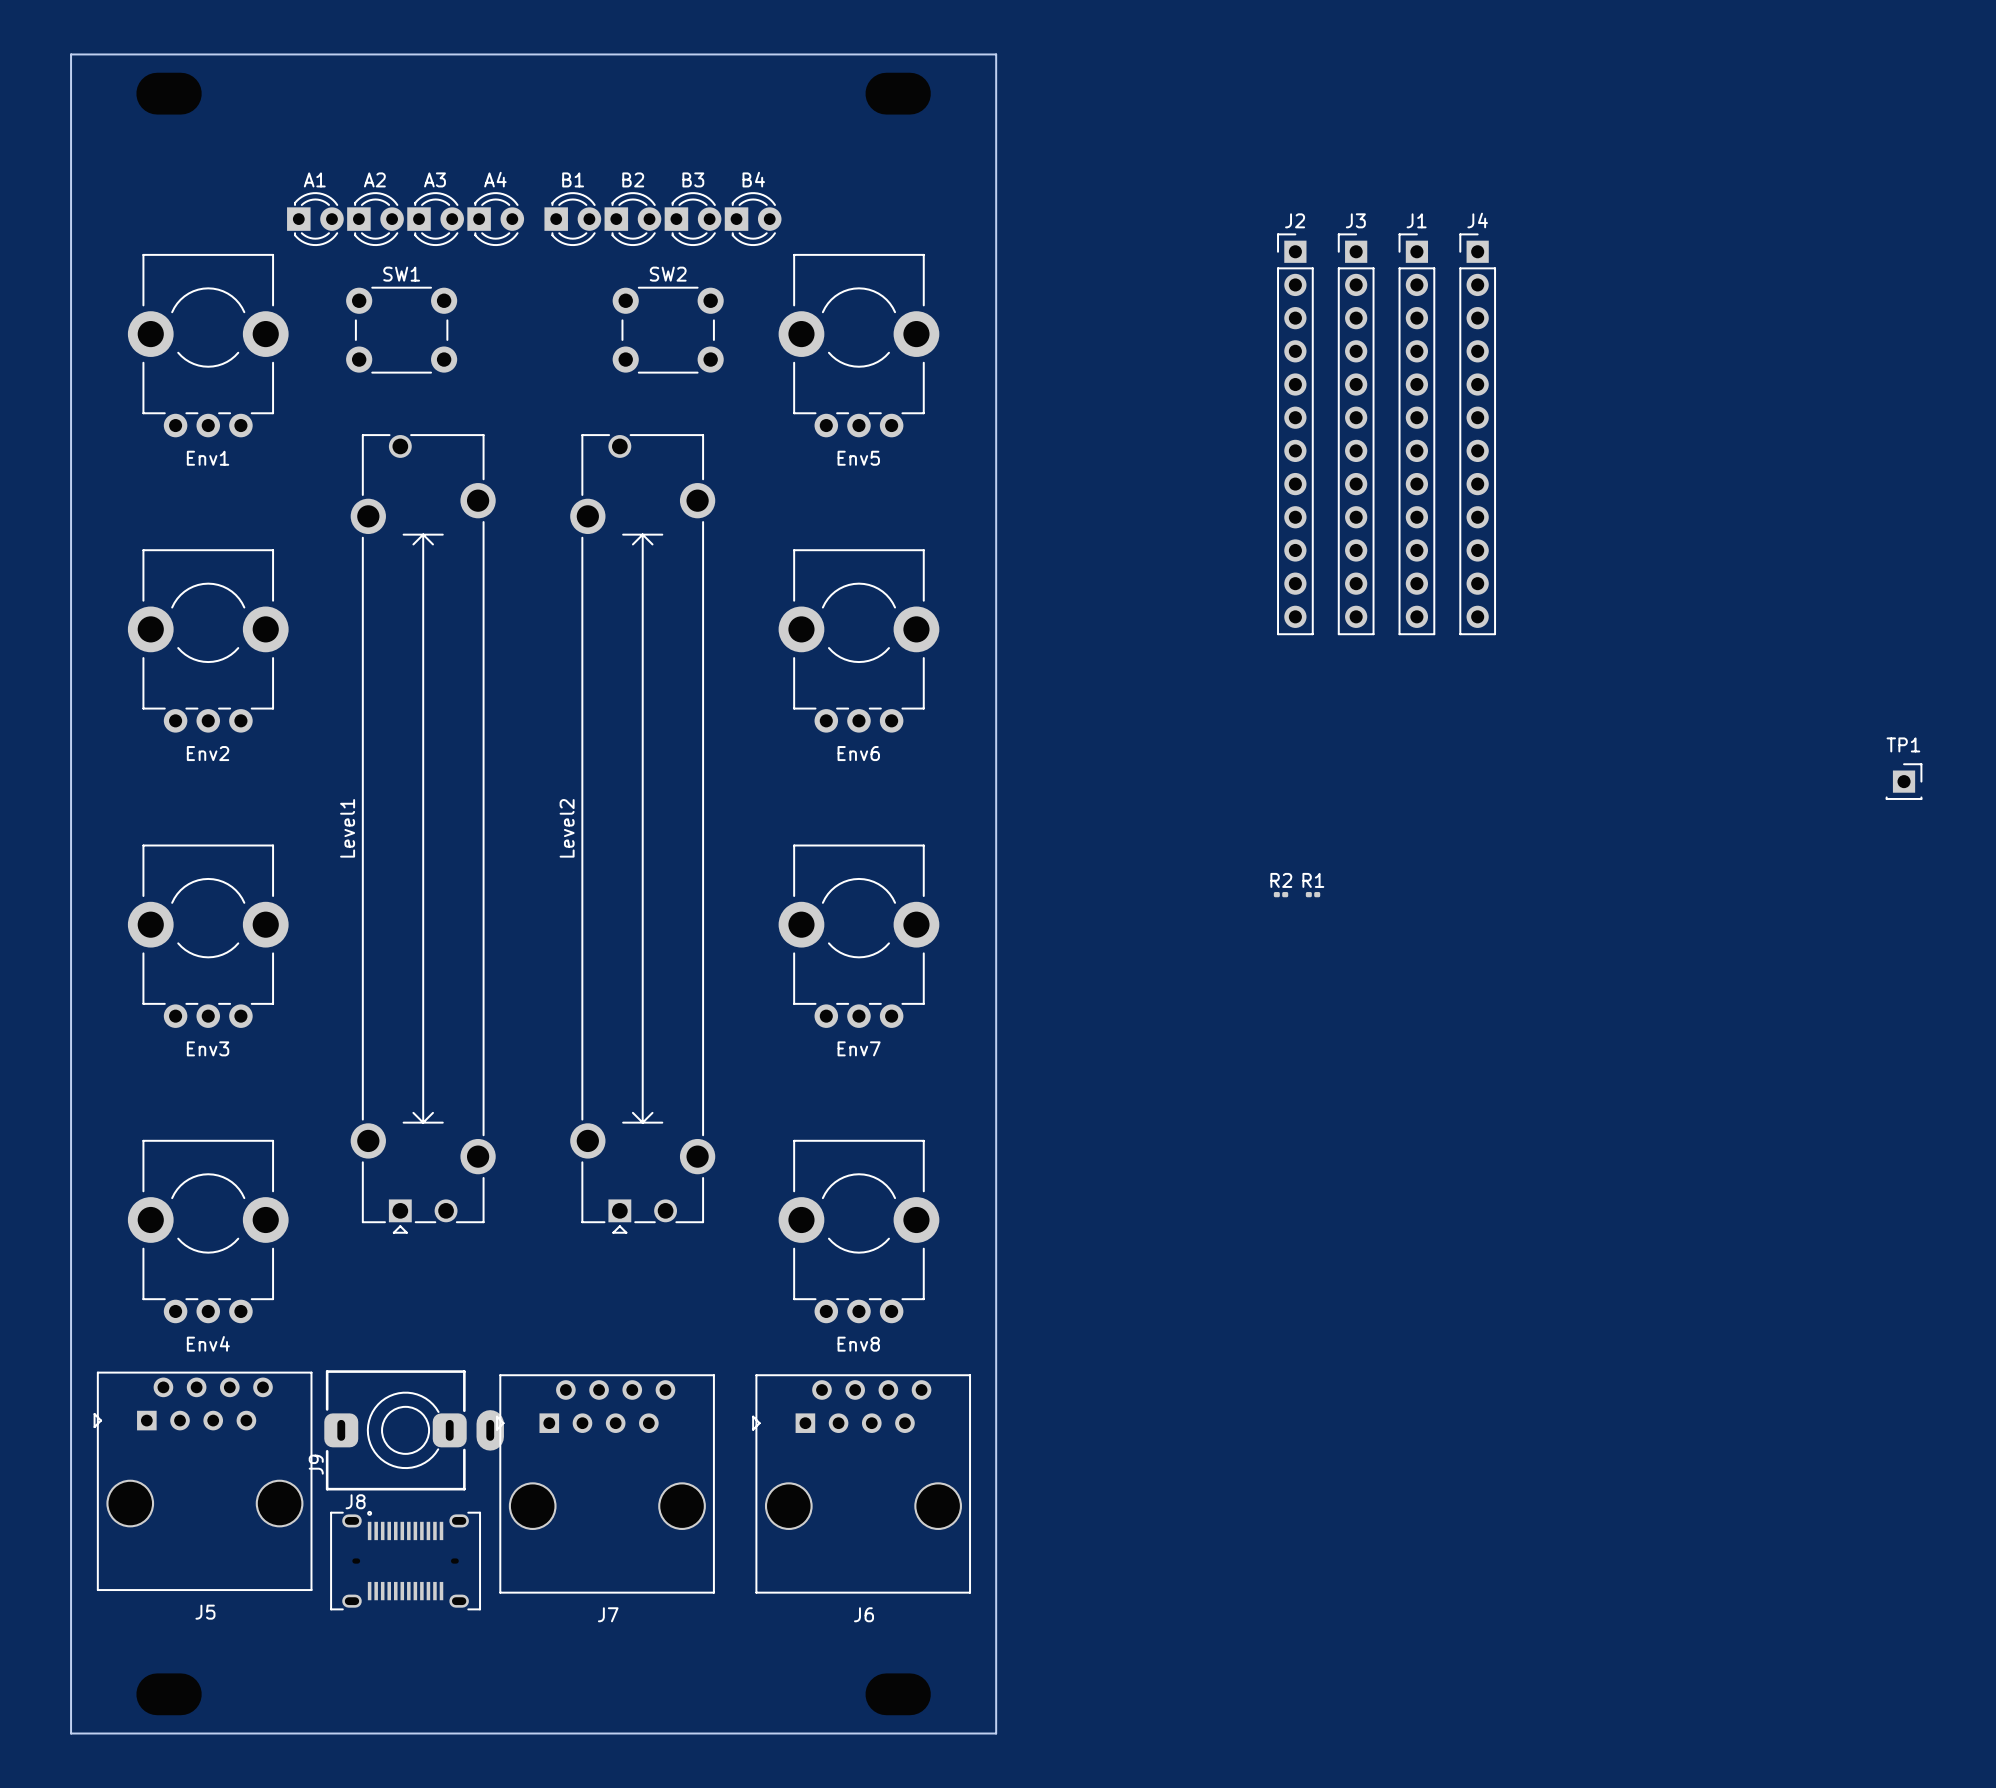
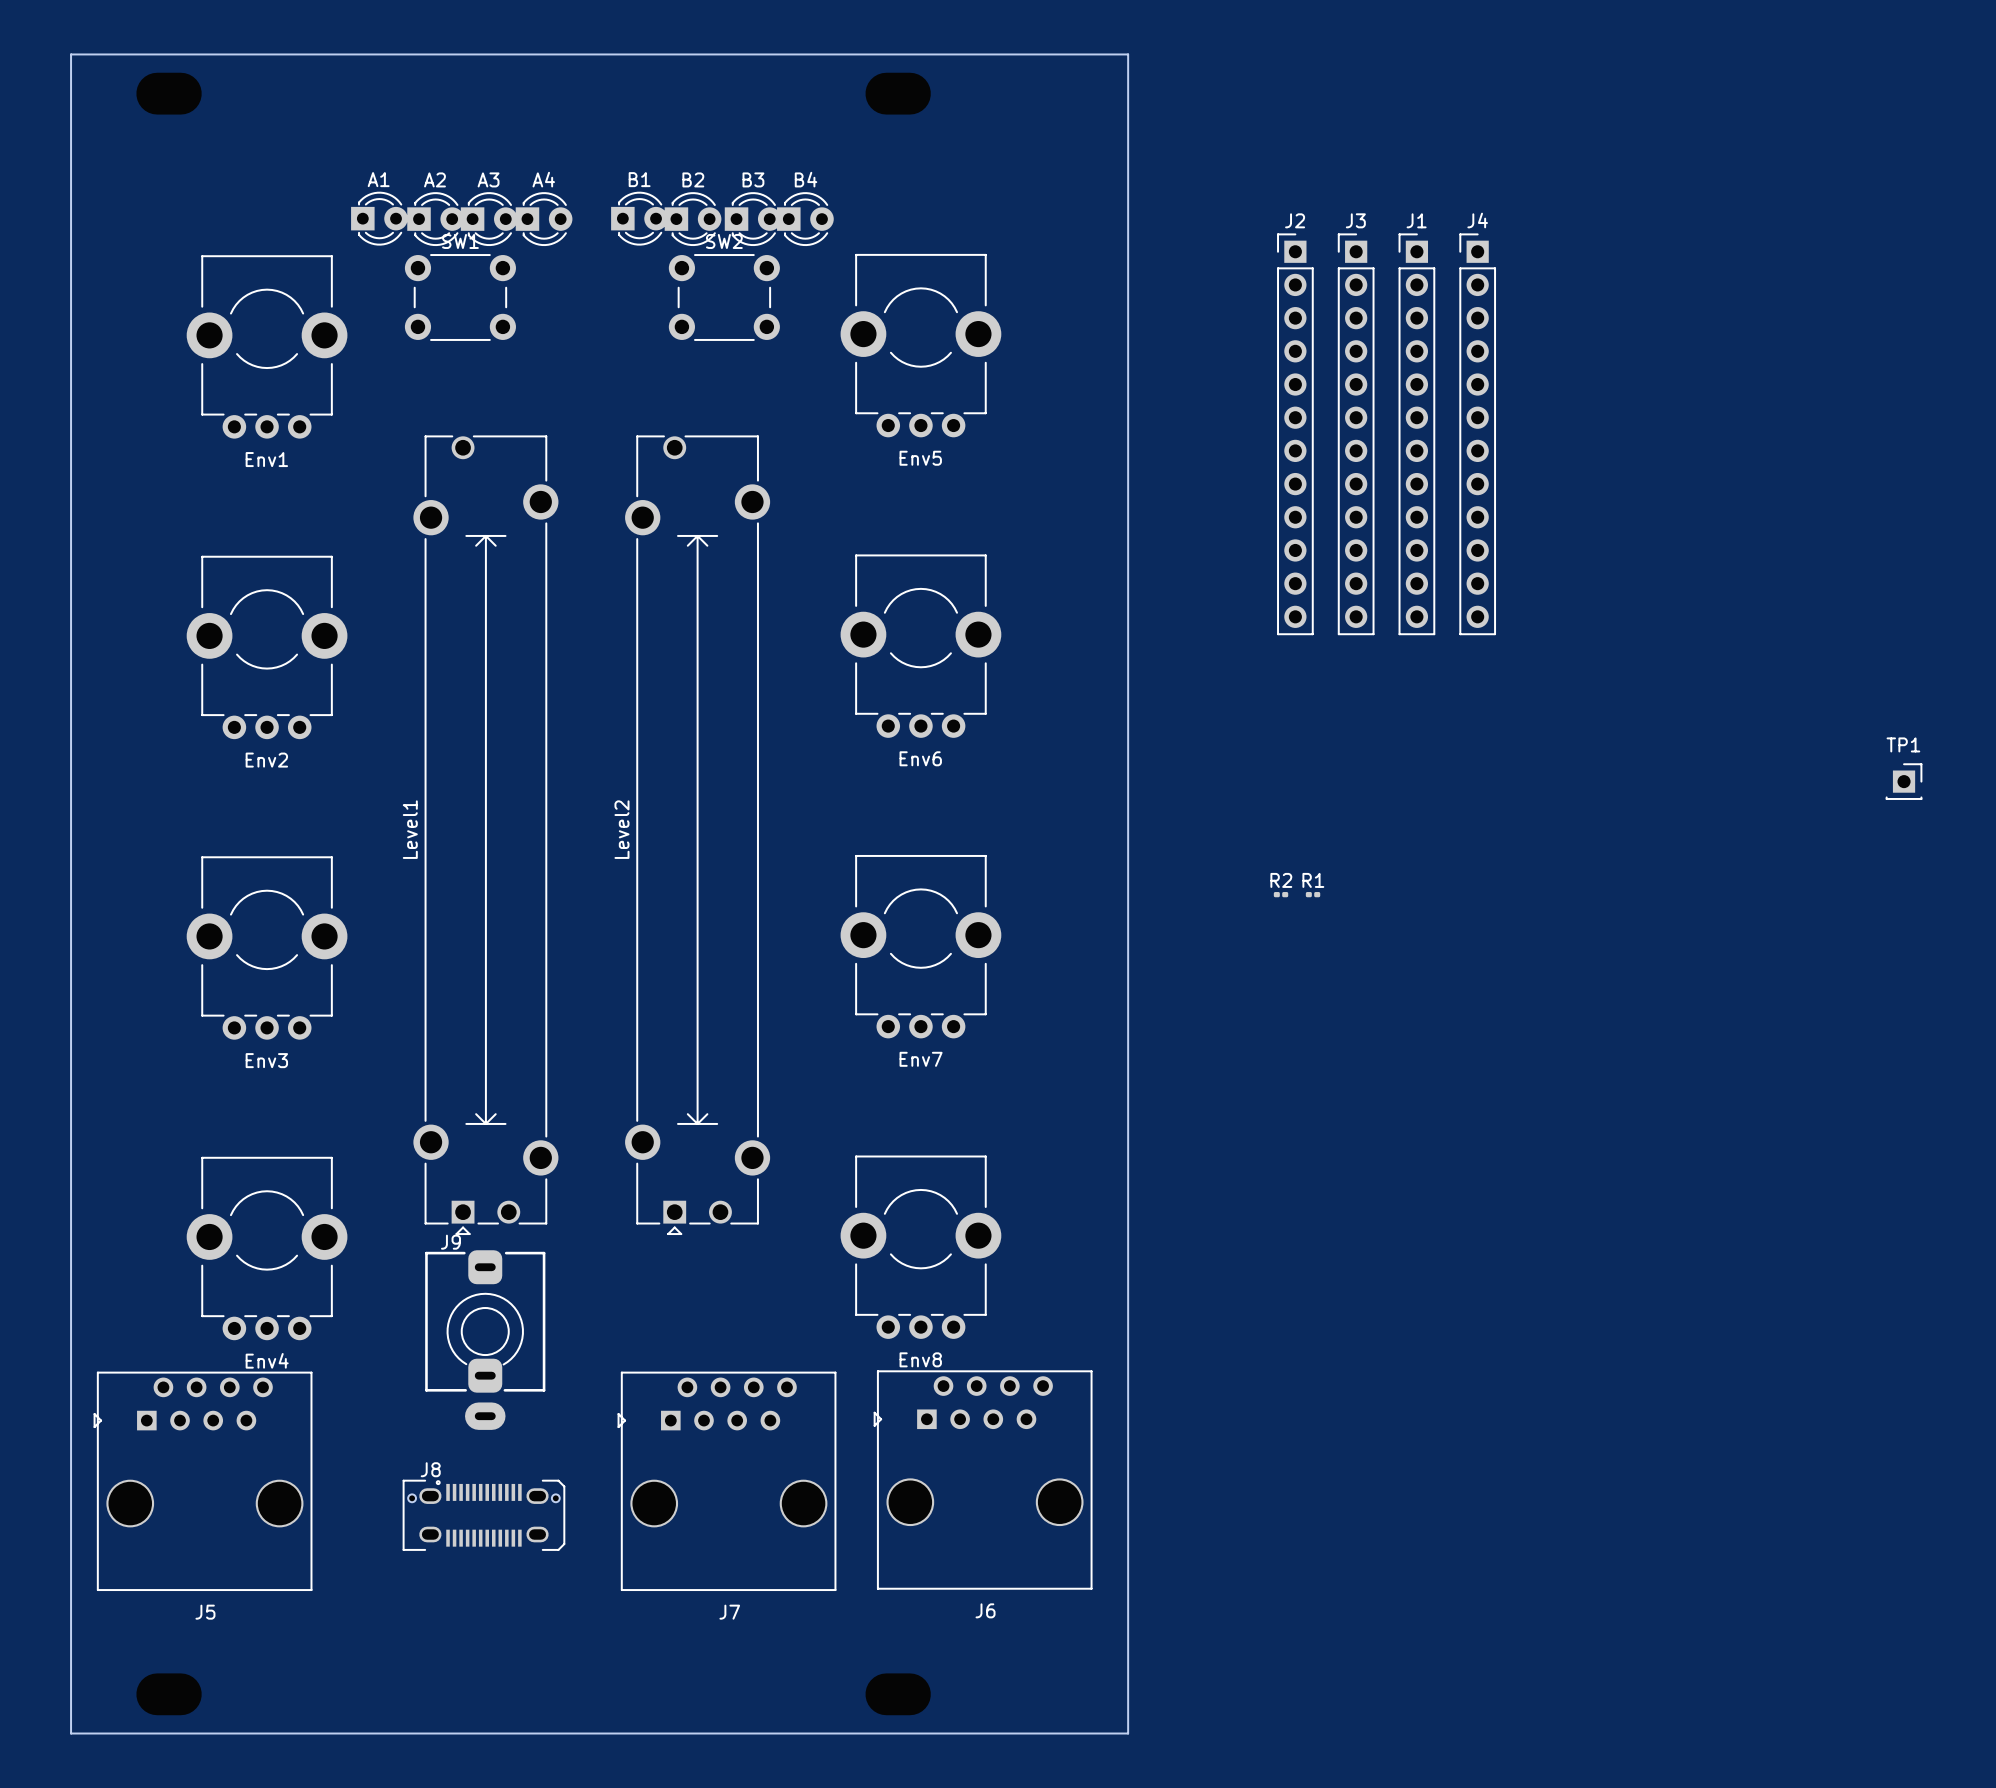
board edge: (996, 54) (996, 1733) -> (996, 54) (1128, 54) (1128, 1733) (996, 1733)
A3 name: A3 (434, 179) -> A2 (434, 179)
B3 name: B3 (693, 179) -> B2 (693, 179)
B4 name: B4 (753, 179) -> B3 (753, 179)
A1 position: (315, 219) -> (379, 218)
A2: (375, 219) -> none
A3: none -> (489, 219)
A4 position: (495, 219) -> (544, 219)
B1 position: (572, 219) -> (639, 218)
B2: (632, 219) -> none
B4: none -> (805, 219)
SW1 position: (401, 330) -> (460, 297)
SW2 position: (668, 330) -> (724, 297)
Env1 position: (208, 345) -> (267, 347)
Env5 position: (858, 345) -> (920, 345)
Env2 position: (208, 641) -> (267, 647)
Env6 position: (858, 641) -> (920, 646)
Level1 position: (423, 833) -> (485, 835)
Level2 position: (642, 833) -> (697, 835)
Env3 position: (208, 936) -> (267, 948)
Env7 position: (858, 936) -> (920, 946)
Env4 position: (208, 1231) -> (267, 1248)
Env8 position: (858, 1231) -> (920, 1247)
J9 rotation: 0° (414, 1430) -> 90° clockwise (485, 1340)
J9 position: (414, 1430) -> (485, 1340)
J7 position: (605, 1483) -> (726, 1481)
J6 position: (861, 1483) -> (983, 1480)
J8 footprint: [330, 1511, 481, 1611] -> [402, 1479, 566, 1551]

